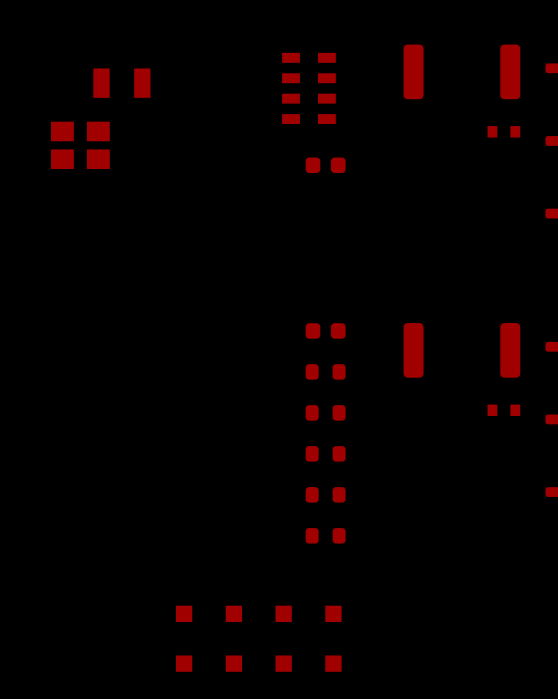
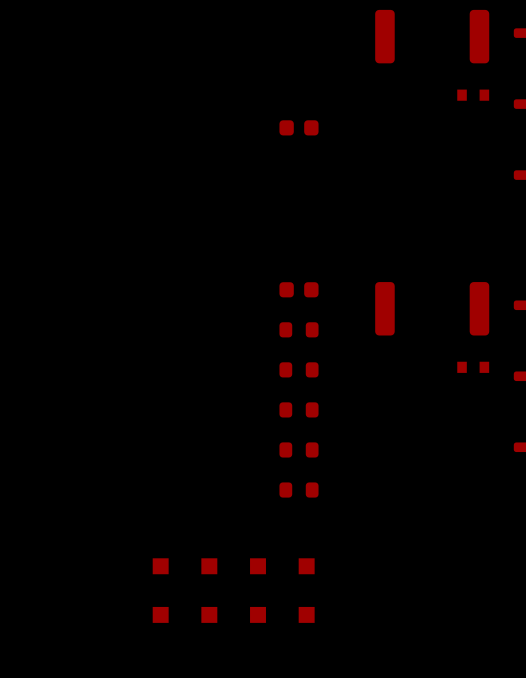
part: (121, 83) -> none
part: (308, 88) -> none
part: (80, 145) -> none

